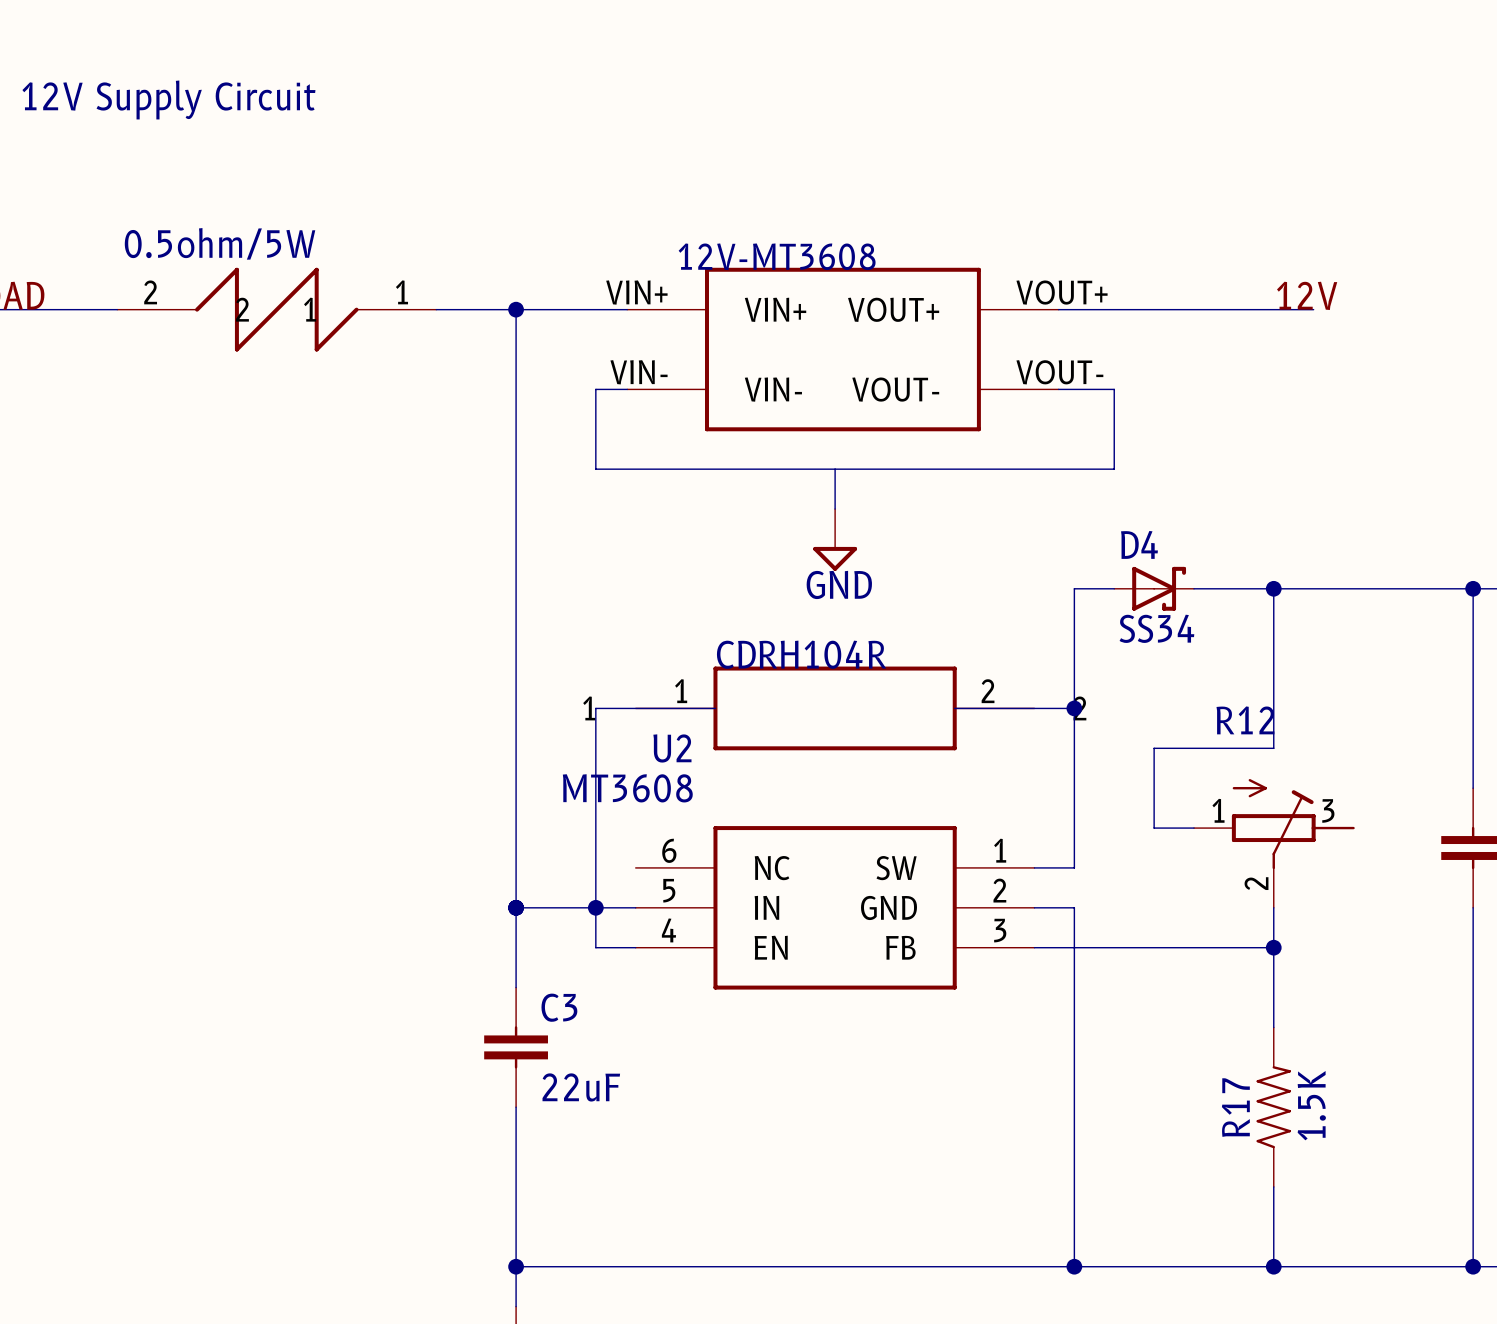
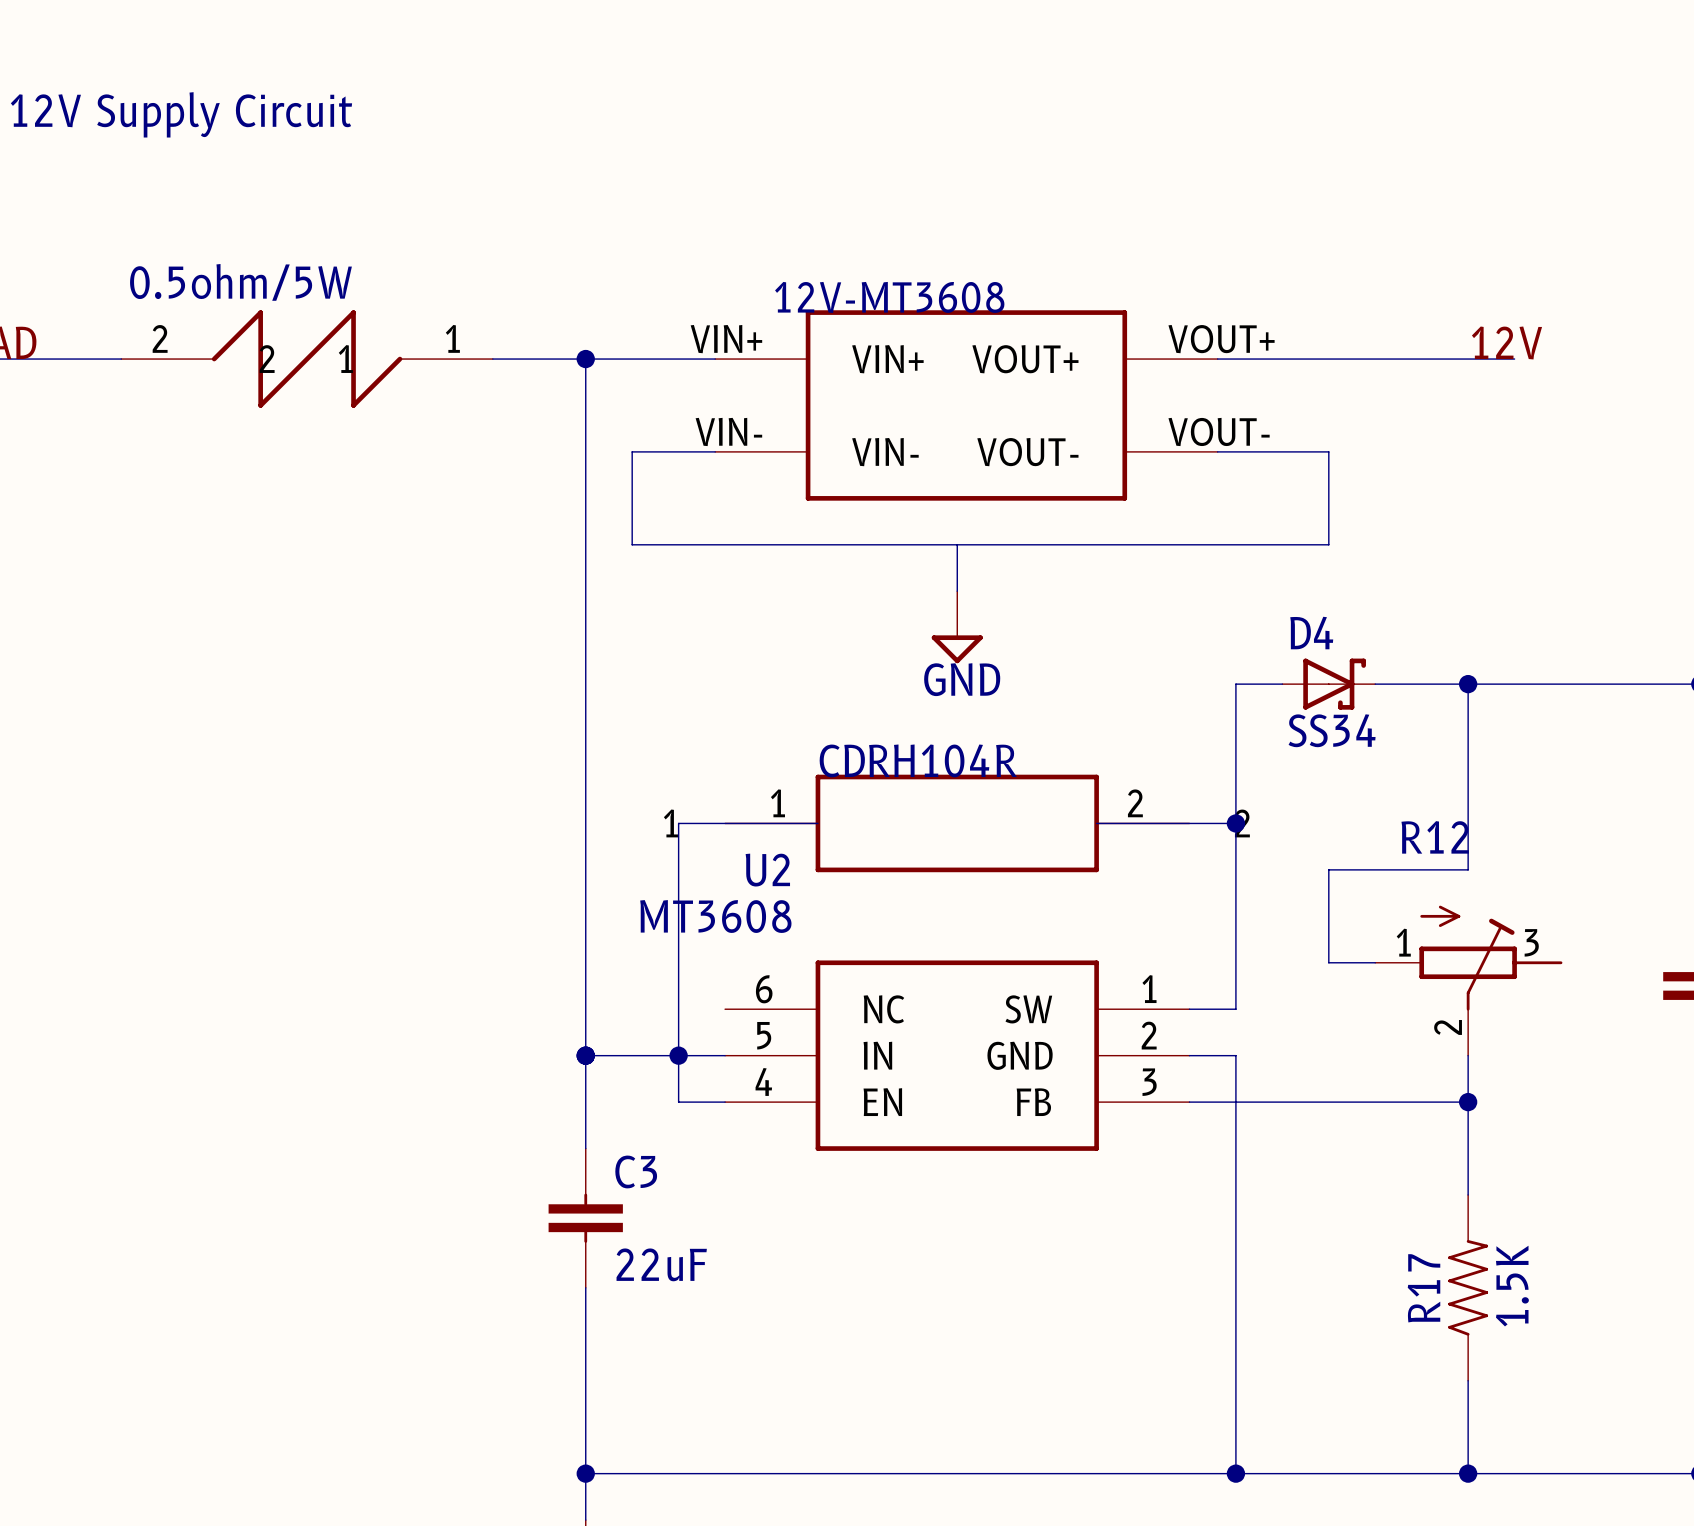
wire: (595, 389) (595, 469) -> (678, 451) (632, 451) (632, 544) (678, 544)
wire: (1114, 389) (1114, 469) -> (1282, 451) (1328, 451) (1328, 544) (1282, 544)

